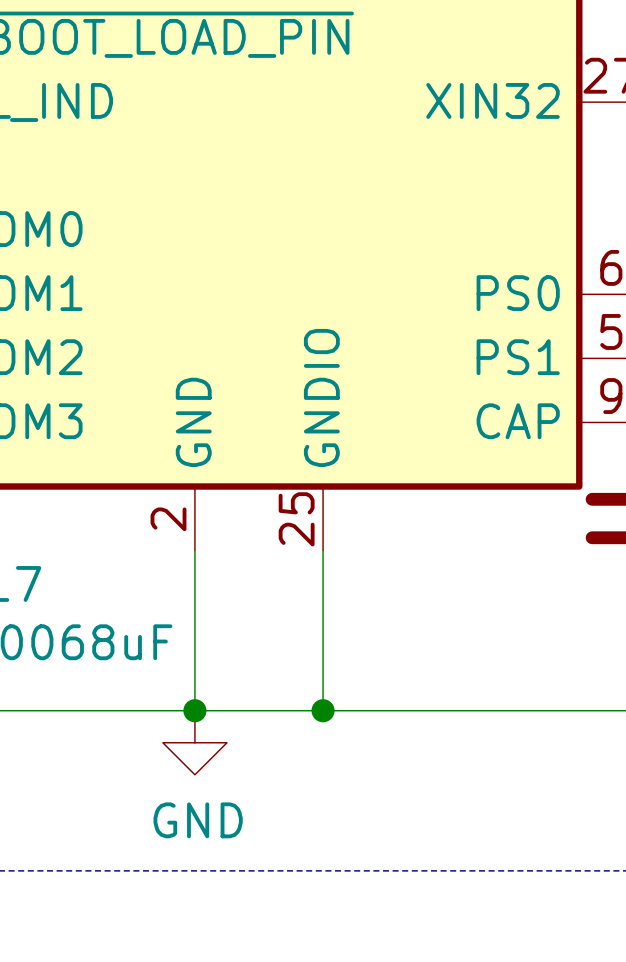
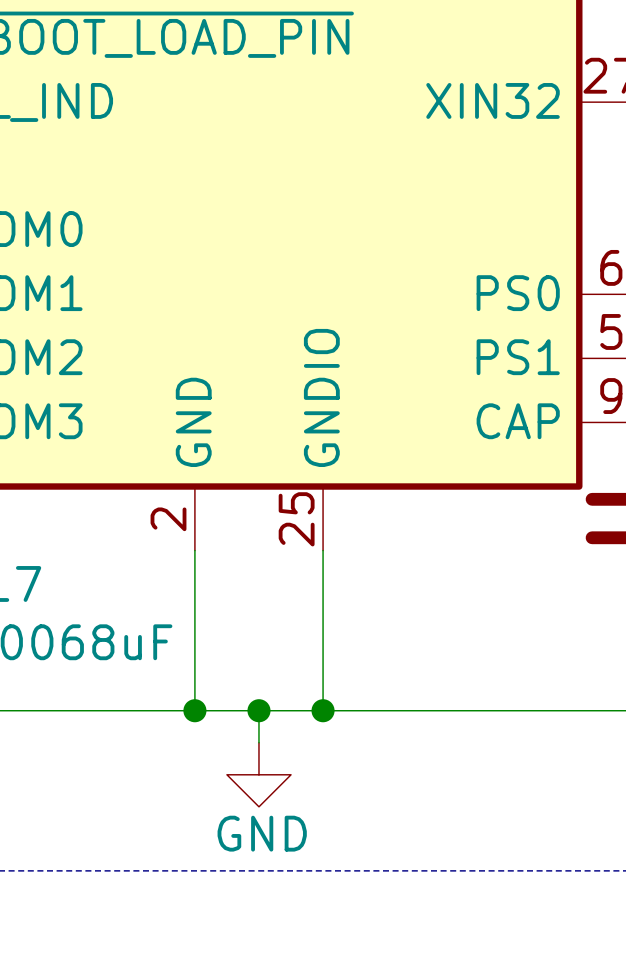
wire: none -> (258, 710) (258, 742)
junction: none -> (258, 710)
power symbol position: GND (194, 742) -> GND (258, 774)
power symbol text position: GND (198, 820) -> GND (262, 833)

